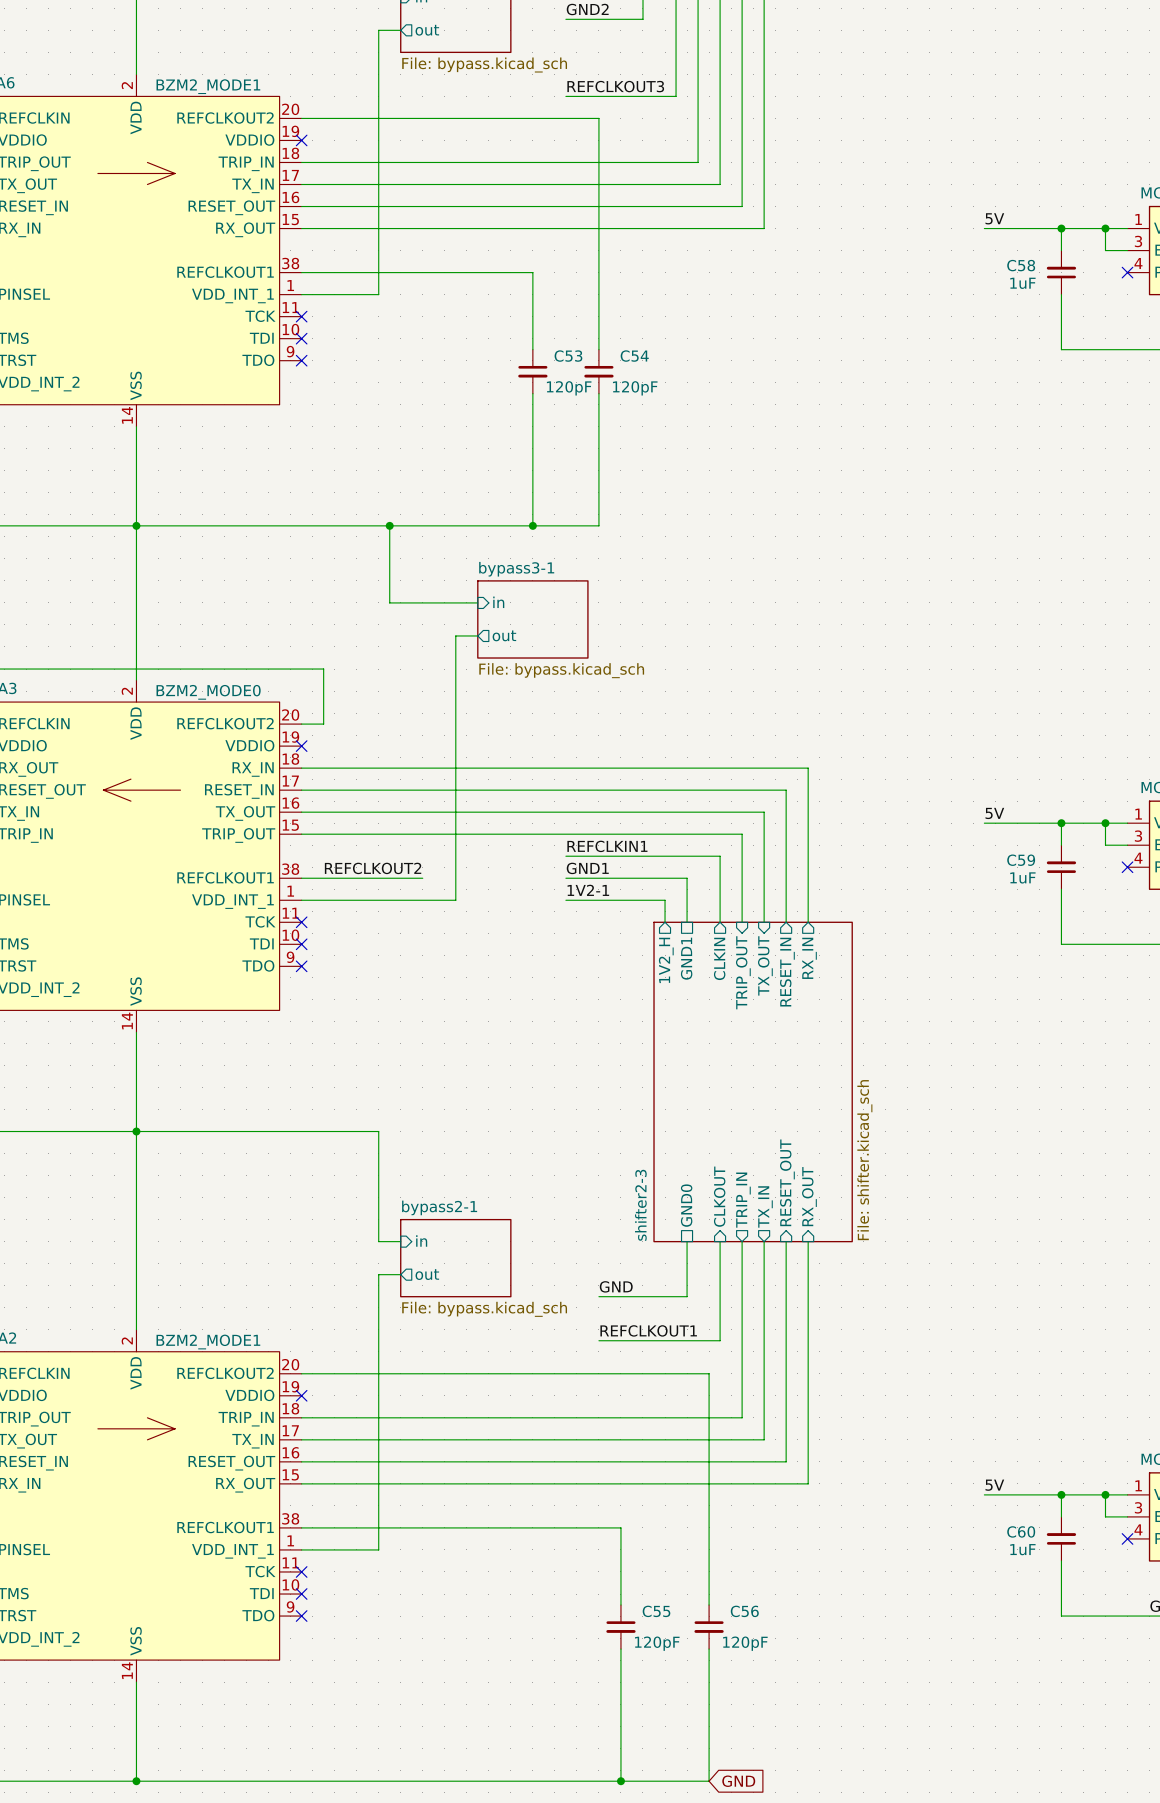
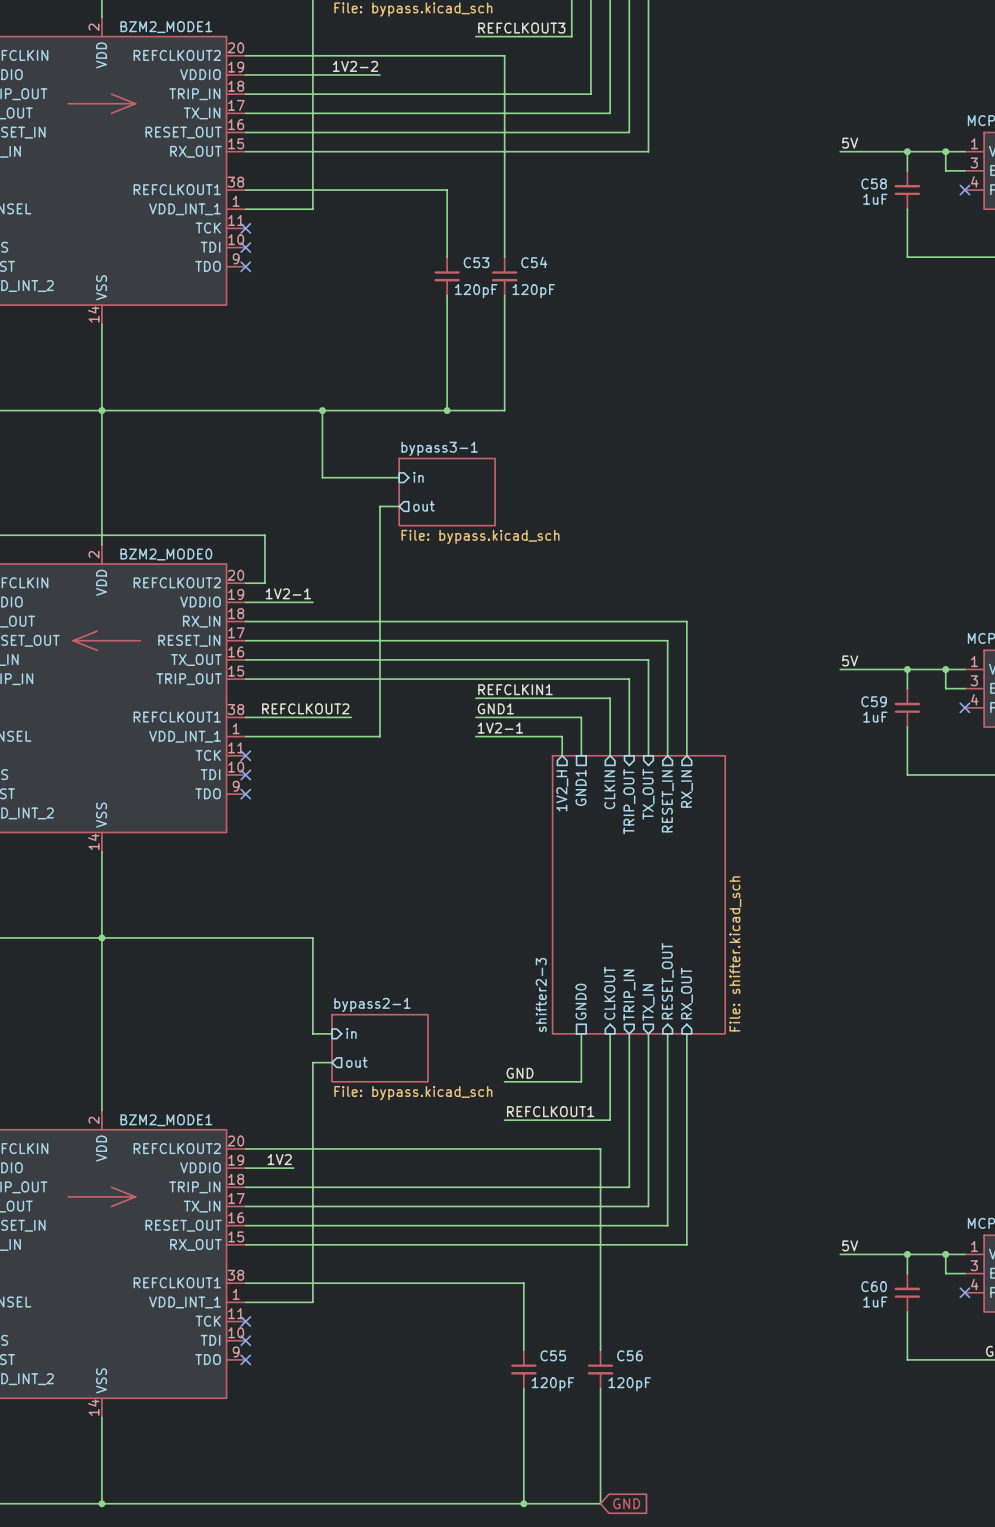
label: none -> 1V2-2 (355, 66)
wire: none -> (245, 74) (380, 74)
no-connect mark: (301, 140) -> none
label: none -> 1V2-1 (288, 593)
wire: none -> (245, 602) (312, 602)
no-connect mark: (301, 746) -> none
label: none -> 1V2 (279, 1159)
wire: none -> (245, 1168) (293, 1168)
no-connect mark: (301, 1395) -> none

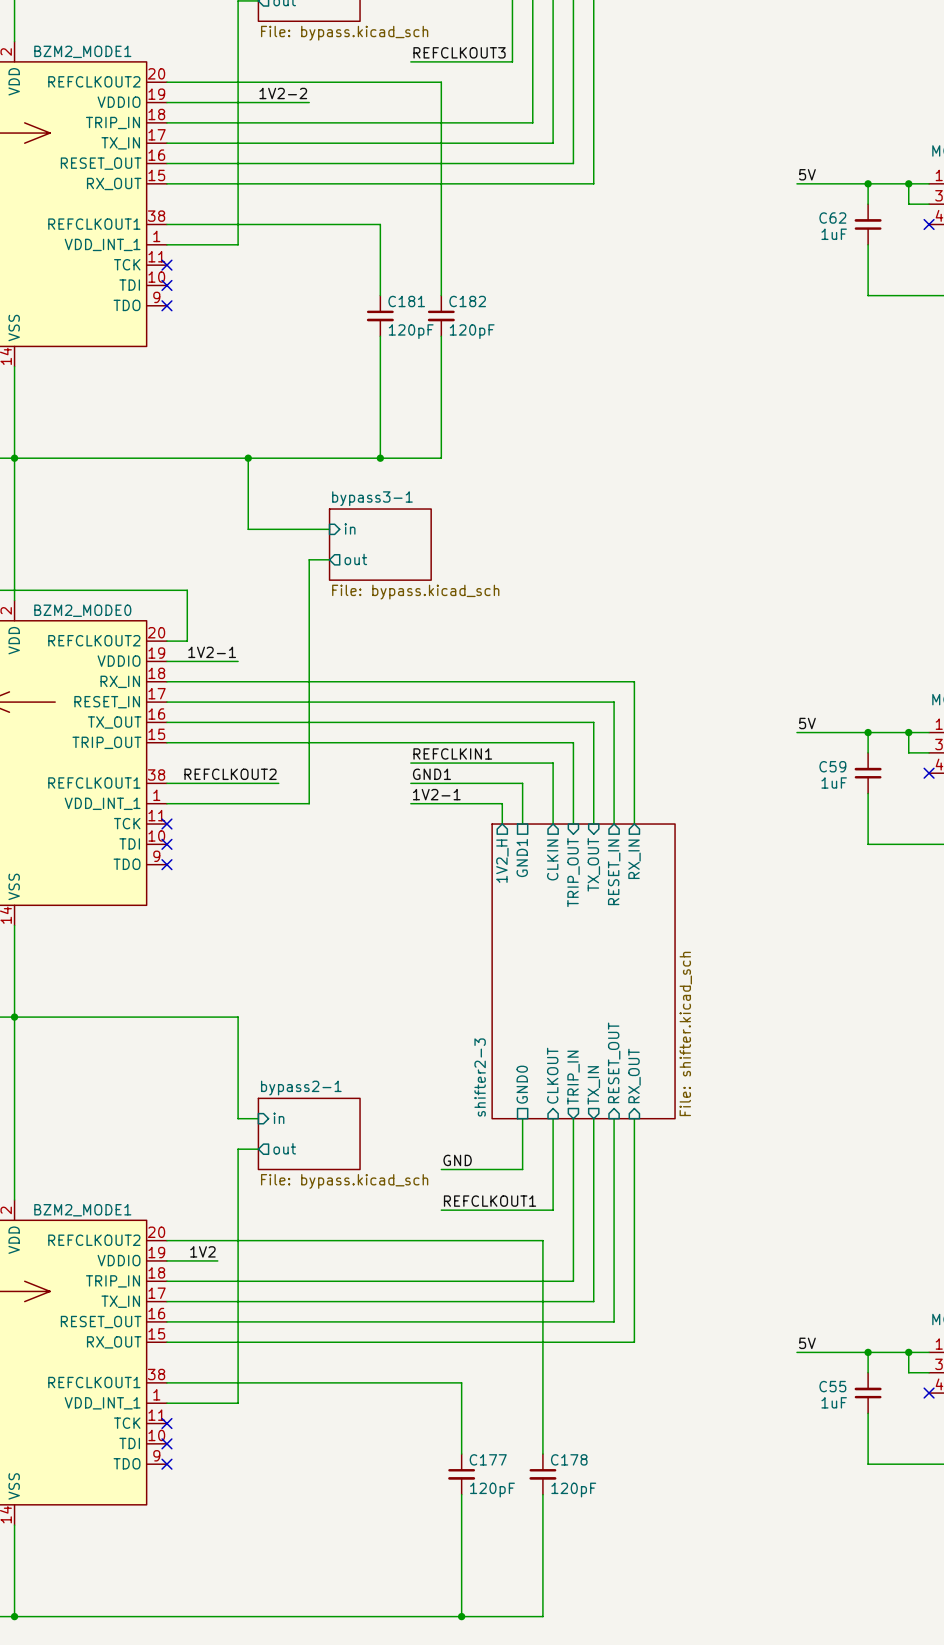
C58 name: C58 (874, 183) -> C62 (832, 218)
C53 name: C53 (476, 262) -> C181 (406, 301)
C54 name: C54 (534, 262) -> C182 (467, 301)
C60 name: C60 (874, 1286) -> C55 (832, 1386)
C55 name: C55 (553, 1355) -> C177 (488, 1459)
C56 name: C56 (629, 1355) -> C178 (569, 1459)
global label: GND (626, 1503) -> none

